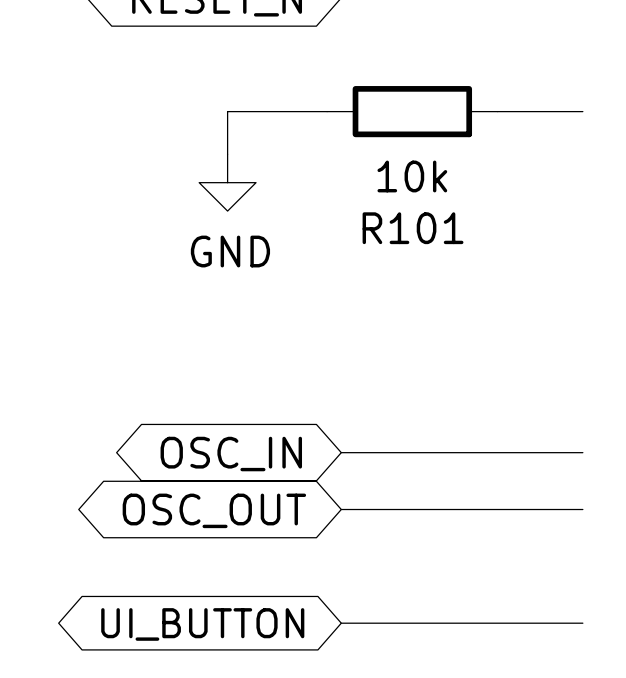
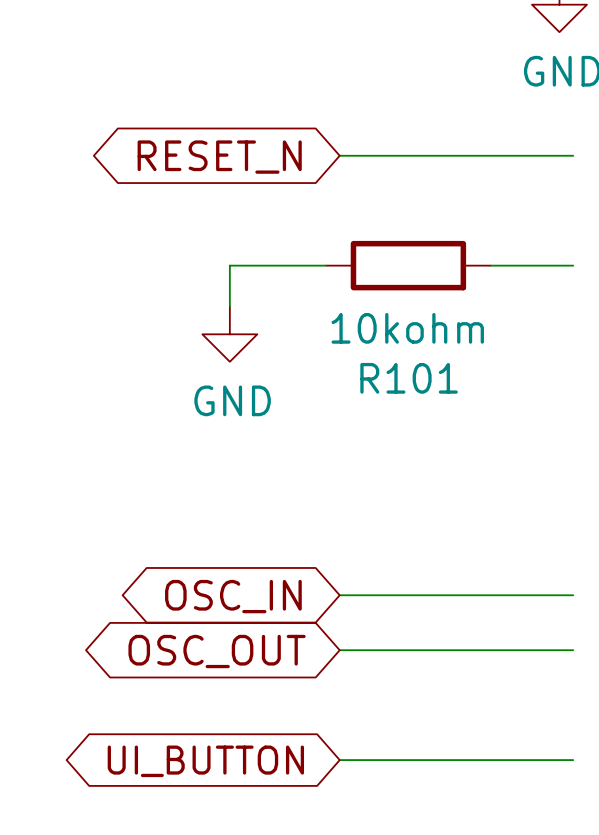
R101 value: 10k (412, 176) -> 10kohm (407, 328)

